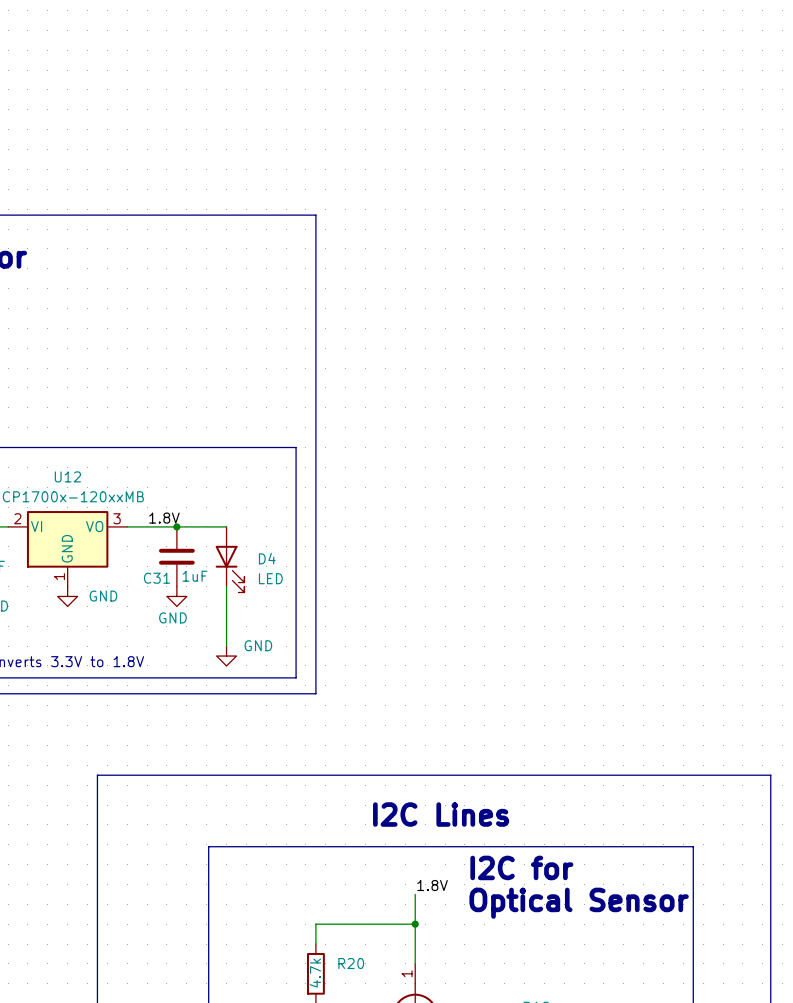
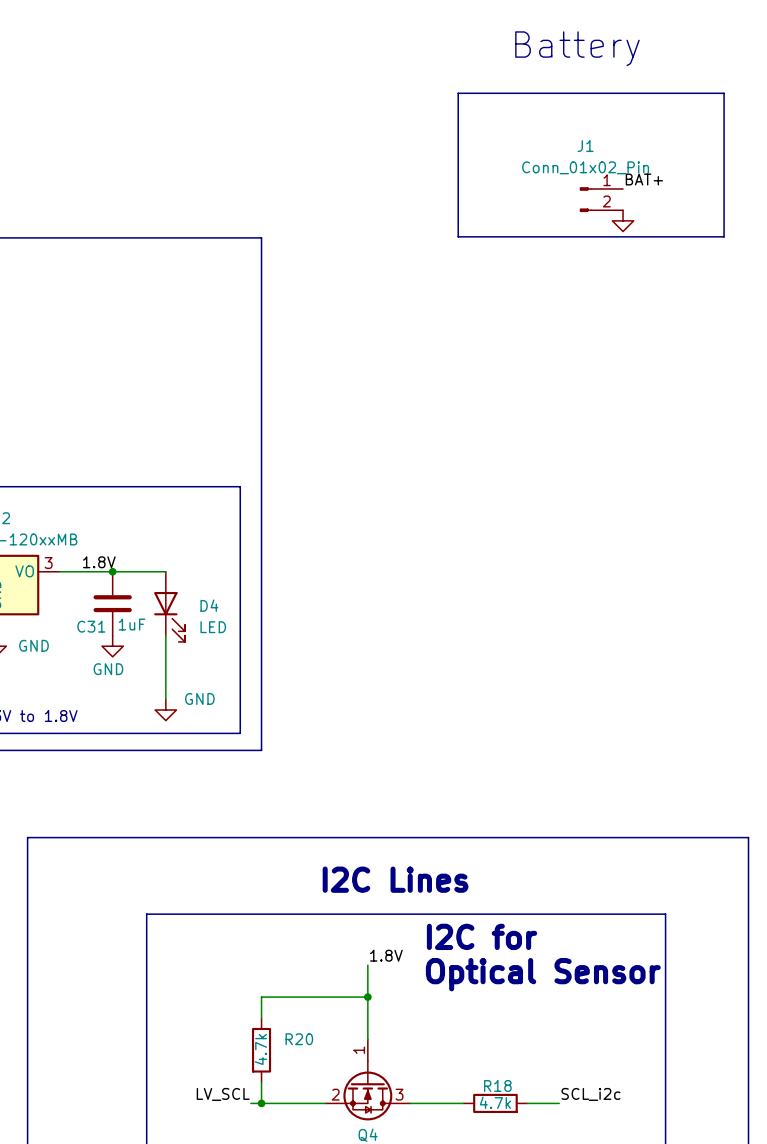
text: none -> Battery (577, 48)
line: none -> (458, 93) (724, 93) (724, 236) (458, 236) (458, 93)
label: none -> BAT+ (644, 179)
J1: none -> Conn_01x02_Pin (601, 199)
power symbol: none -> (623, 220)

